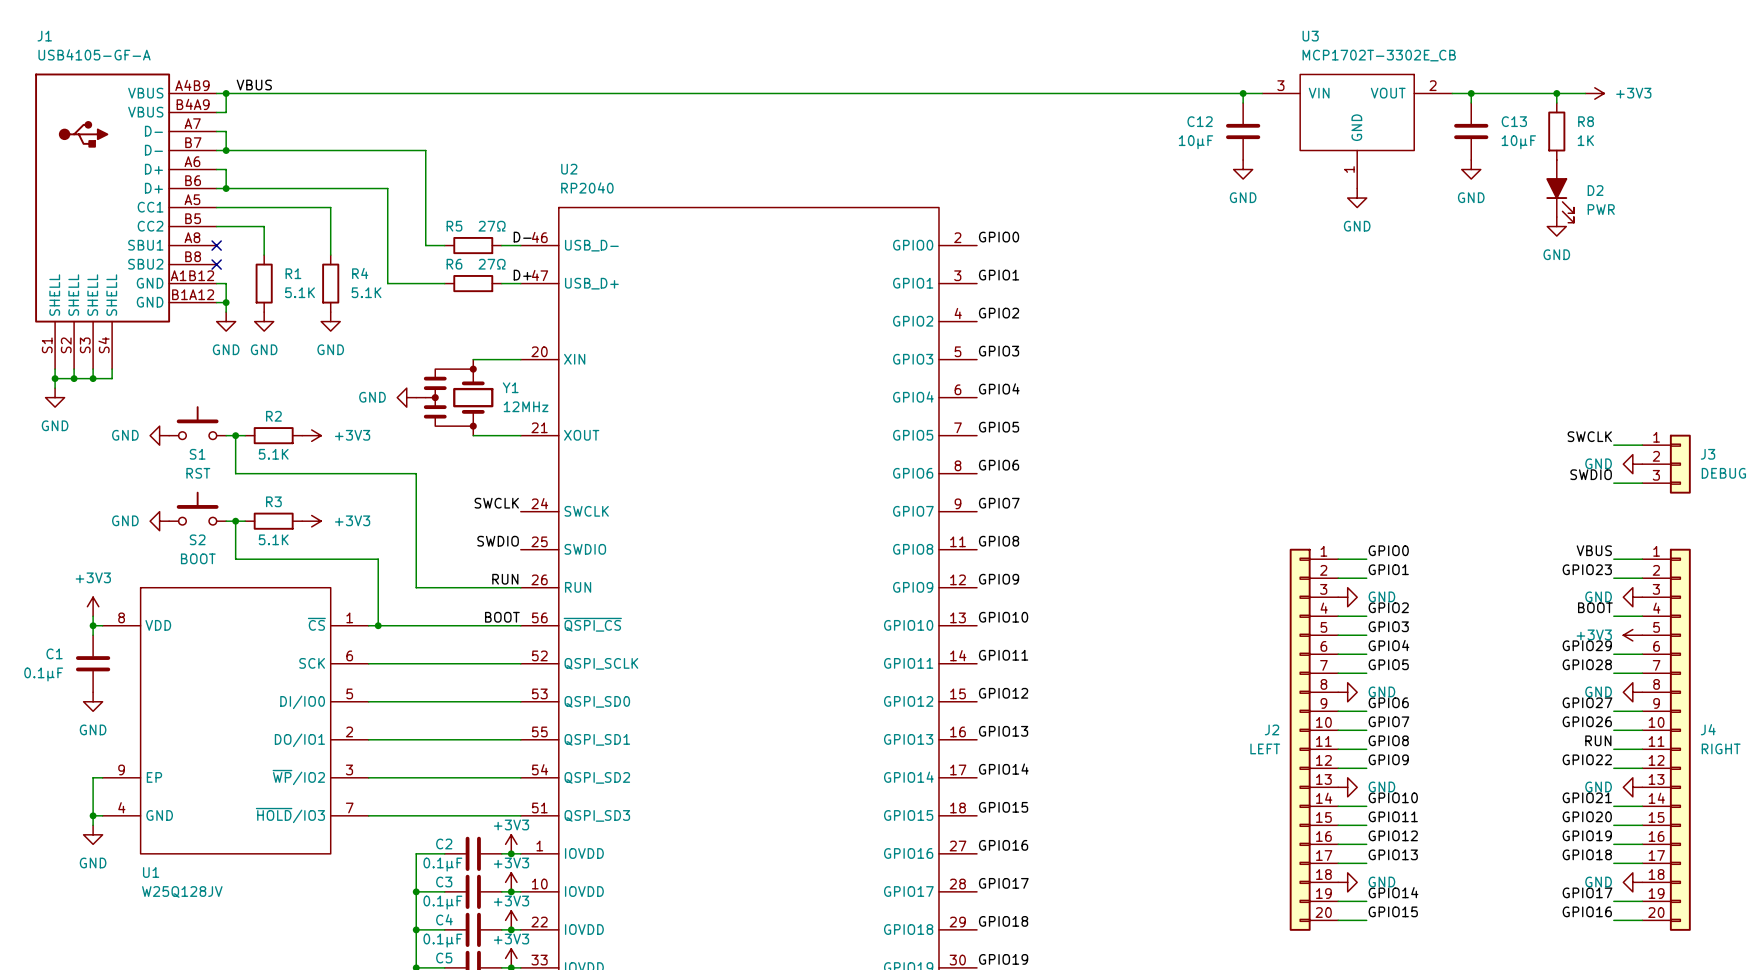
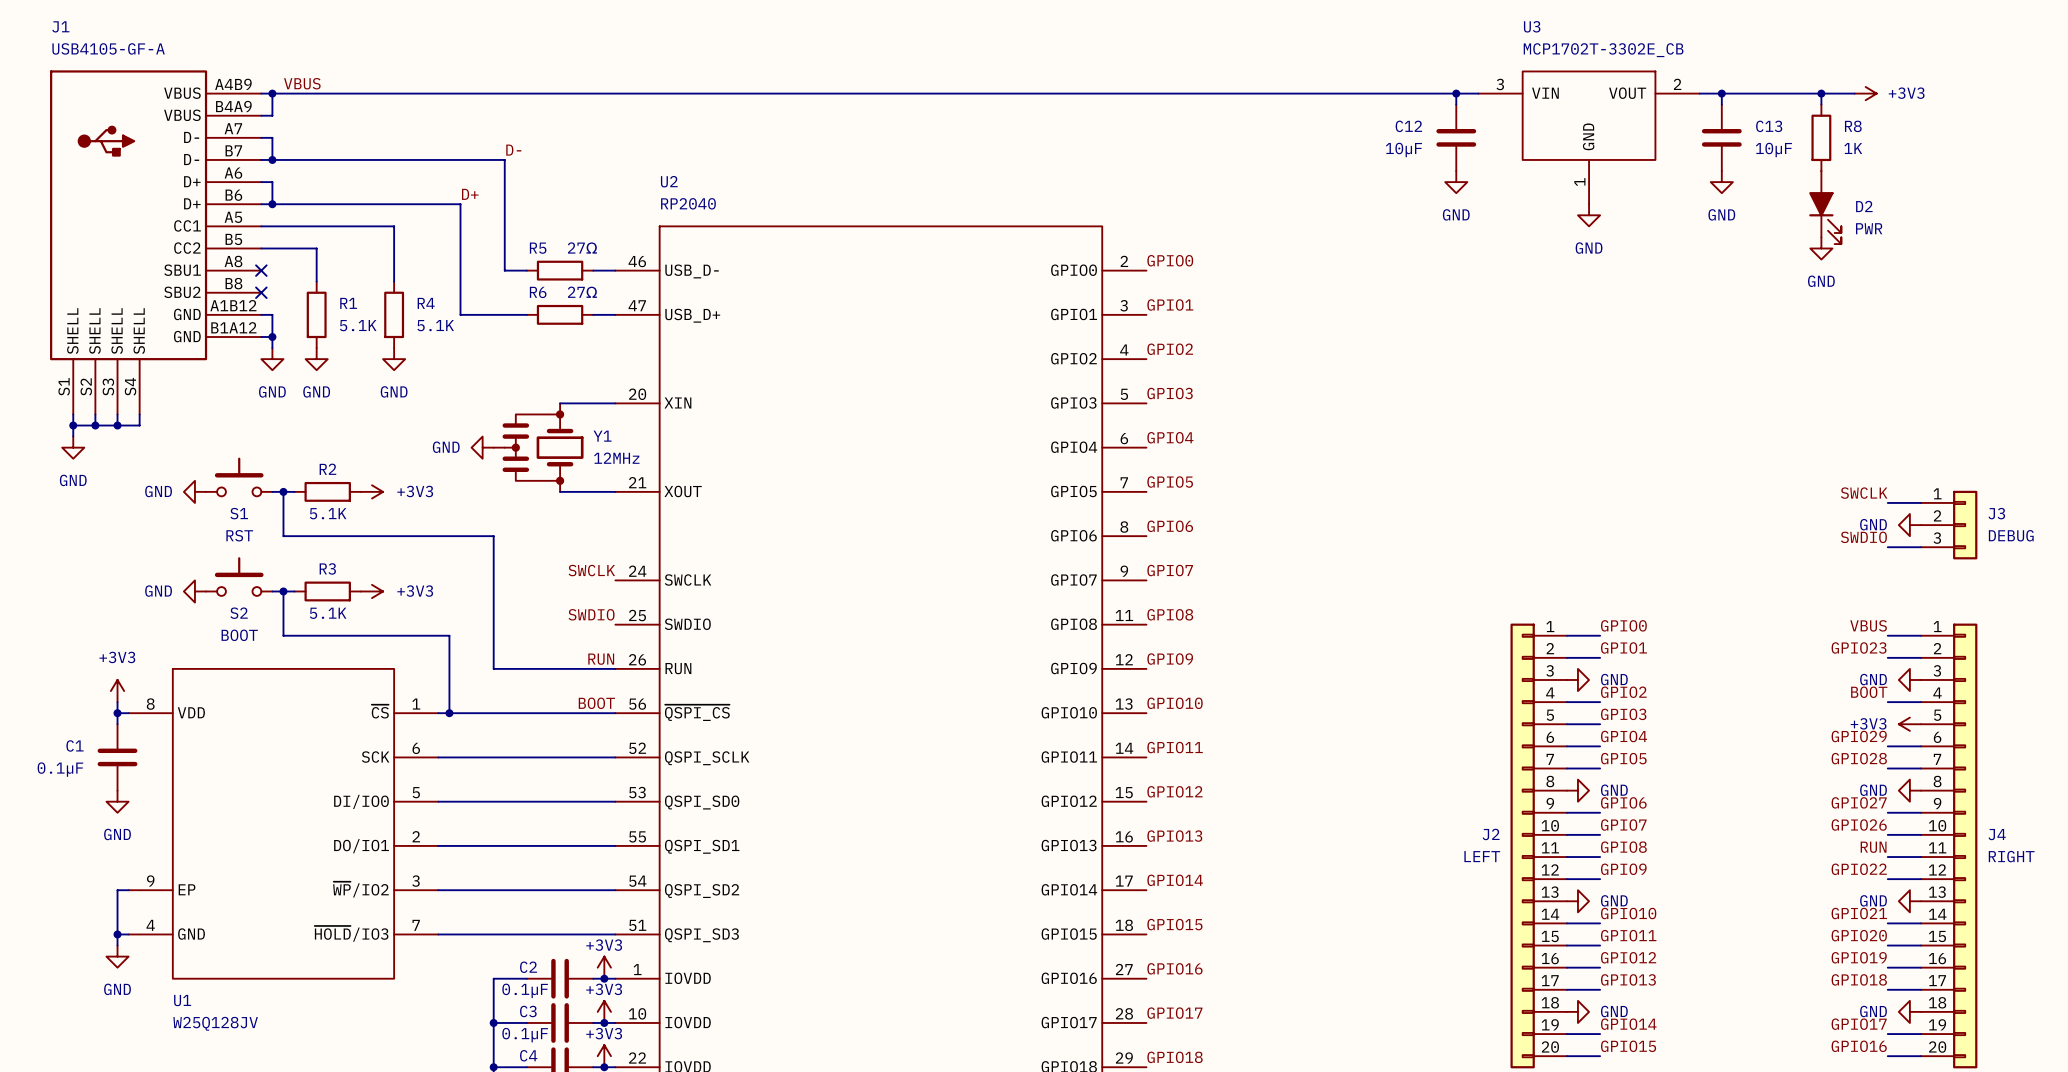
label position: D- (522, 237) -> D- (513, 150)
label position: D+ (522, 275) -> D+ (470, 194)

